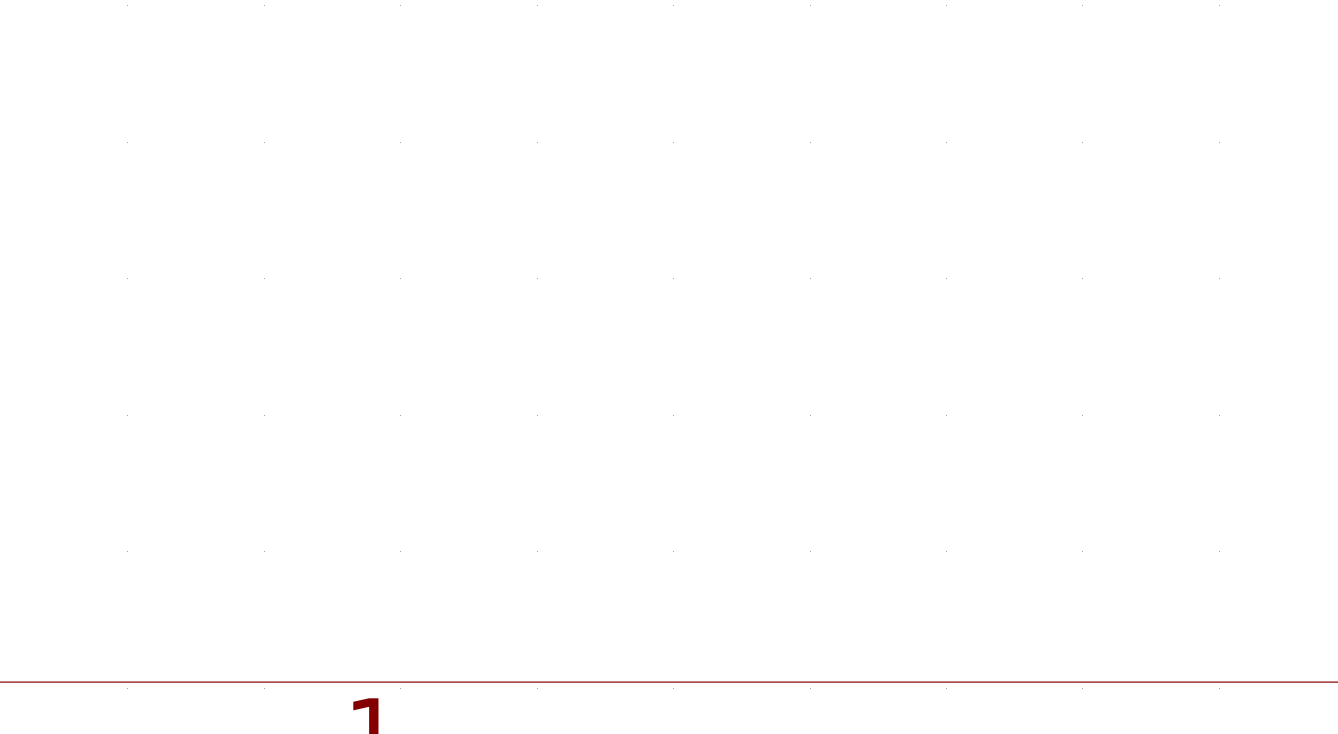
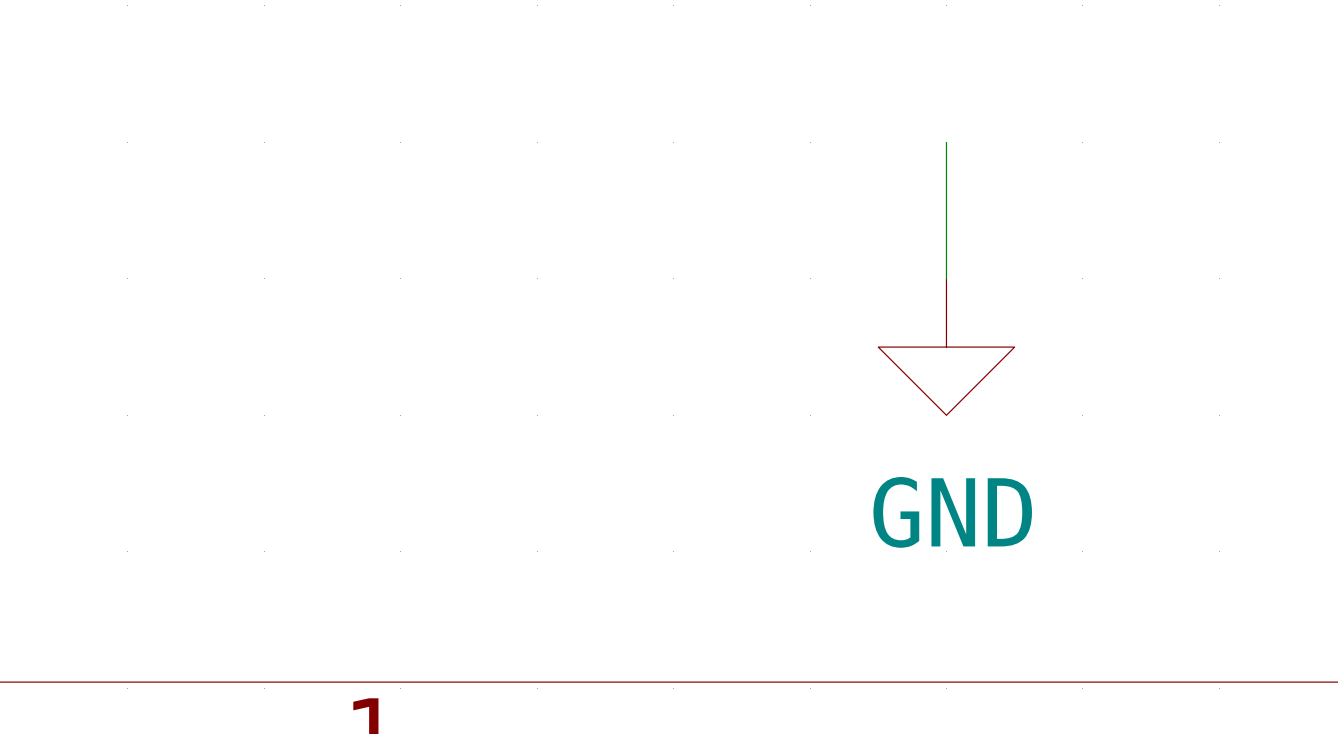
wire: none -> (946, 142) (946, 278)
power symbol: none -> GND (946, 347)

